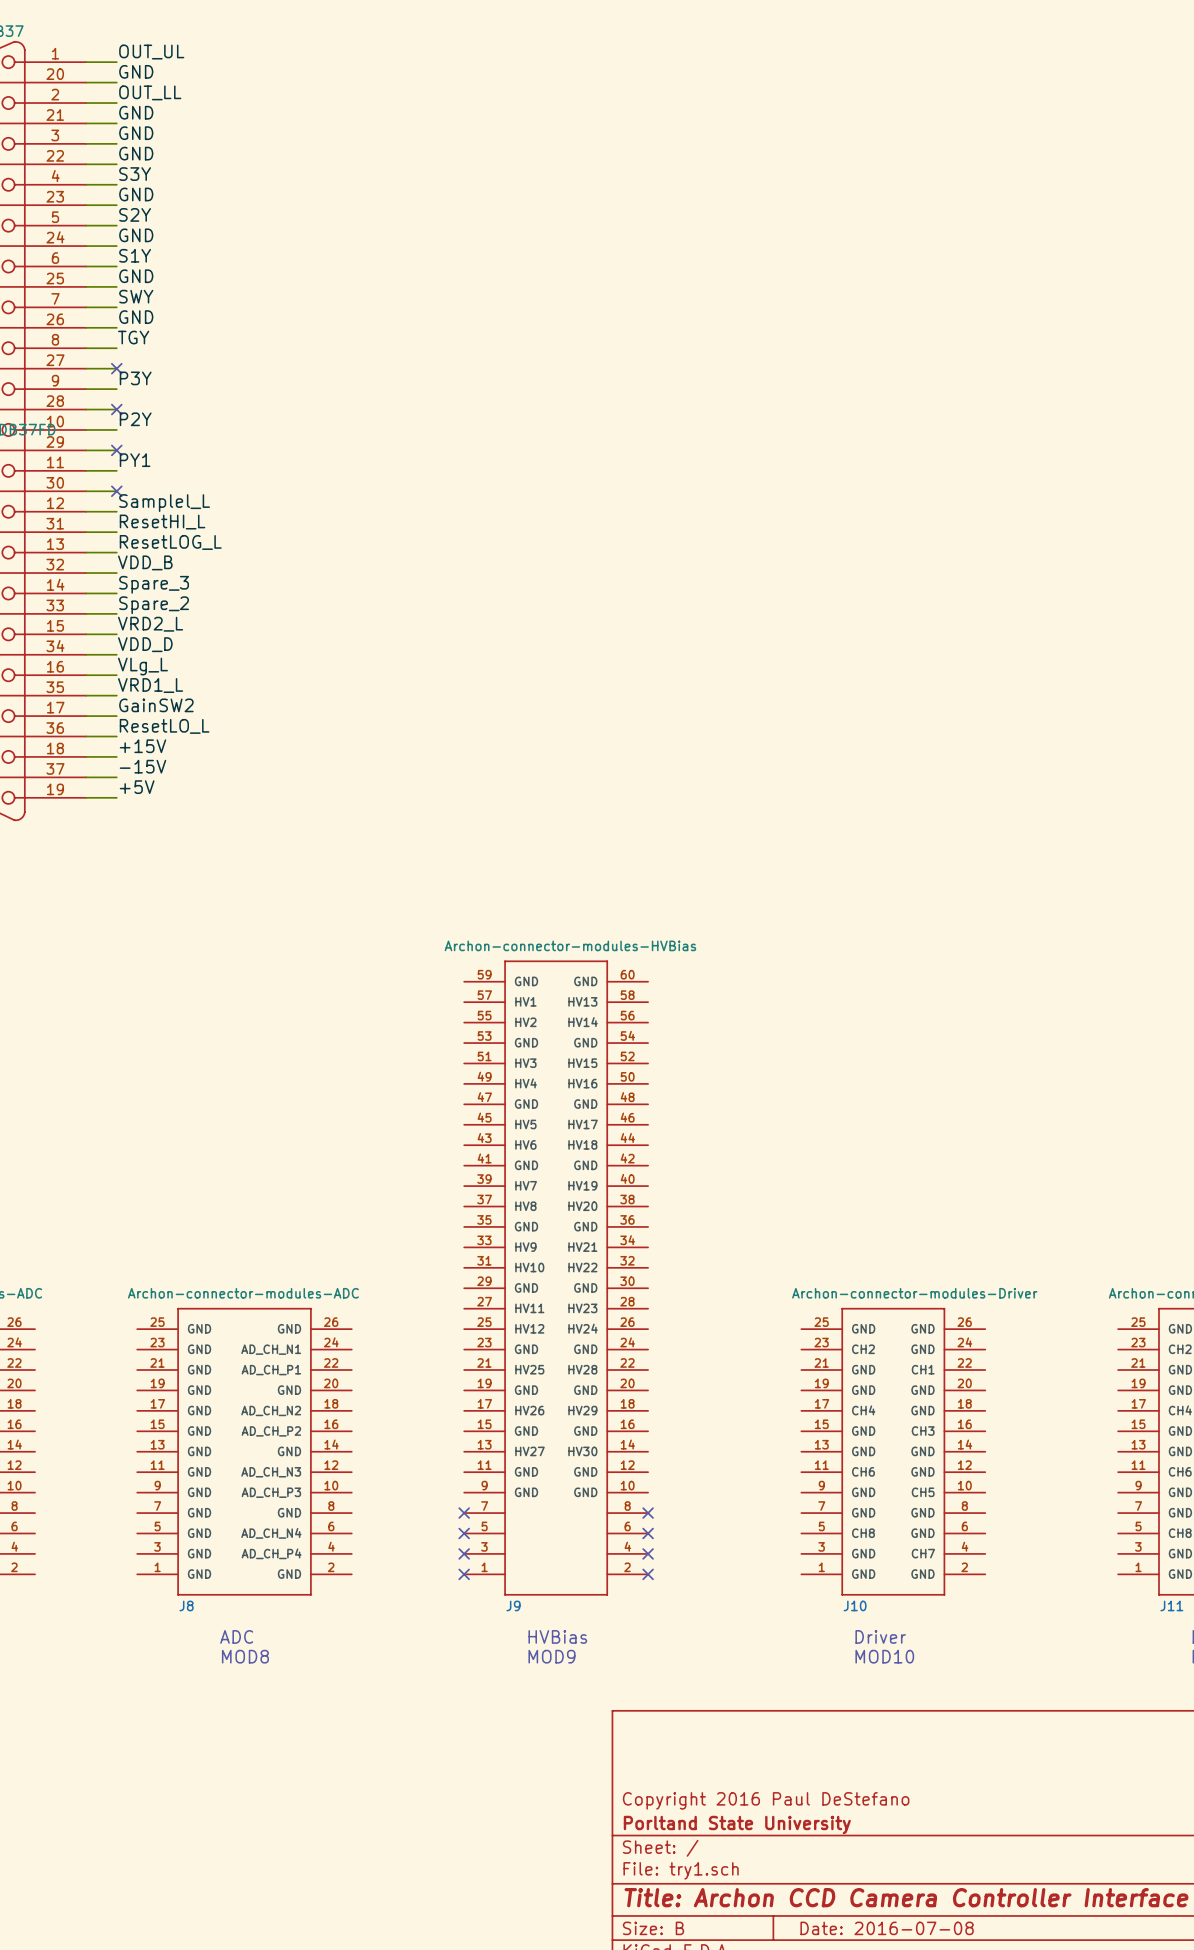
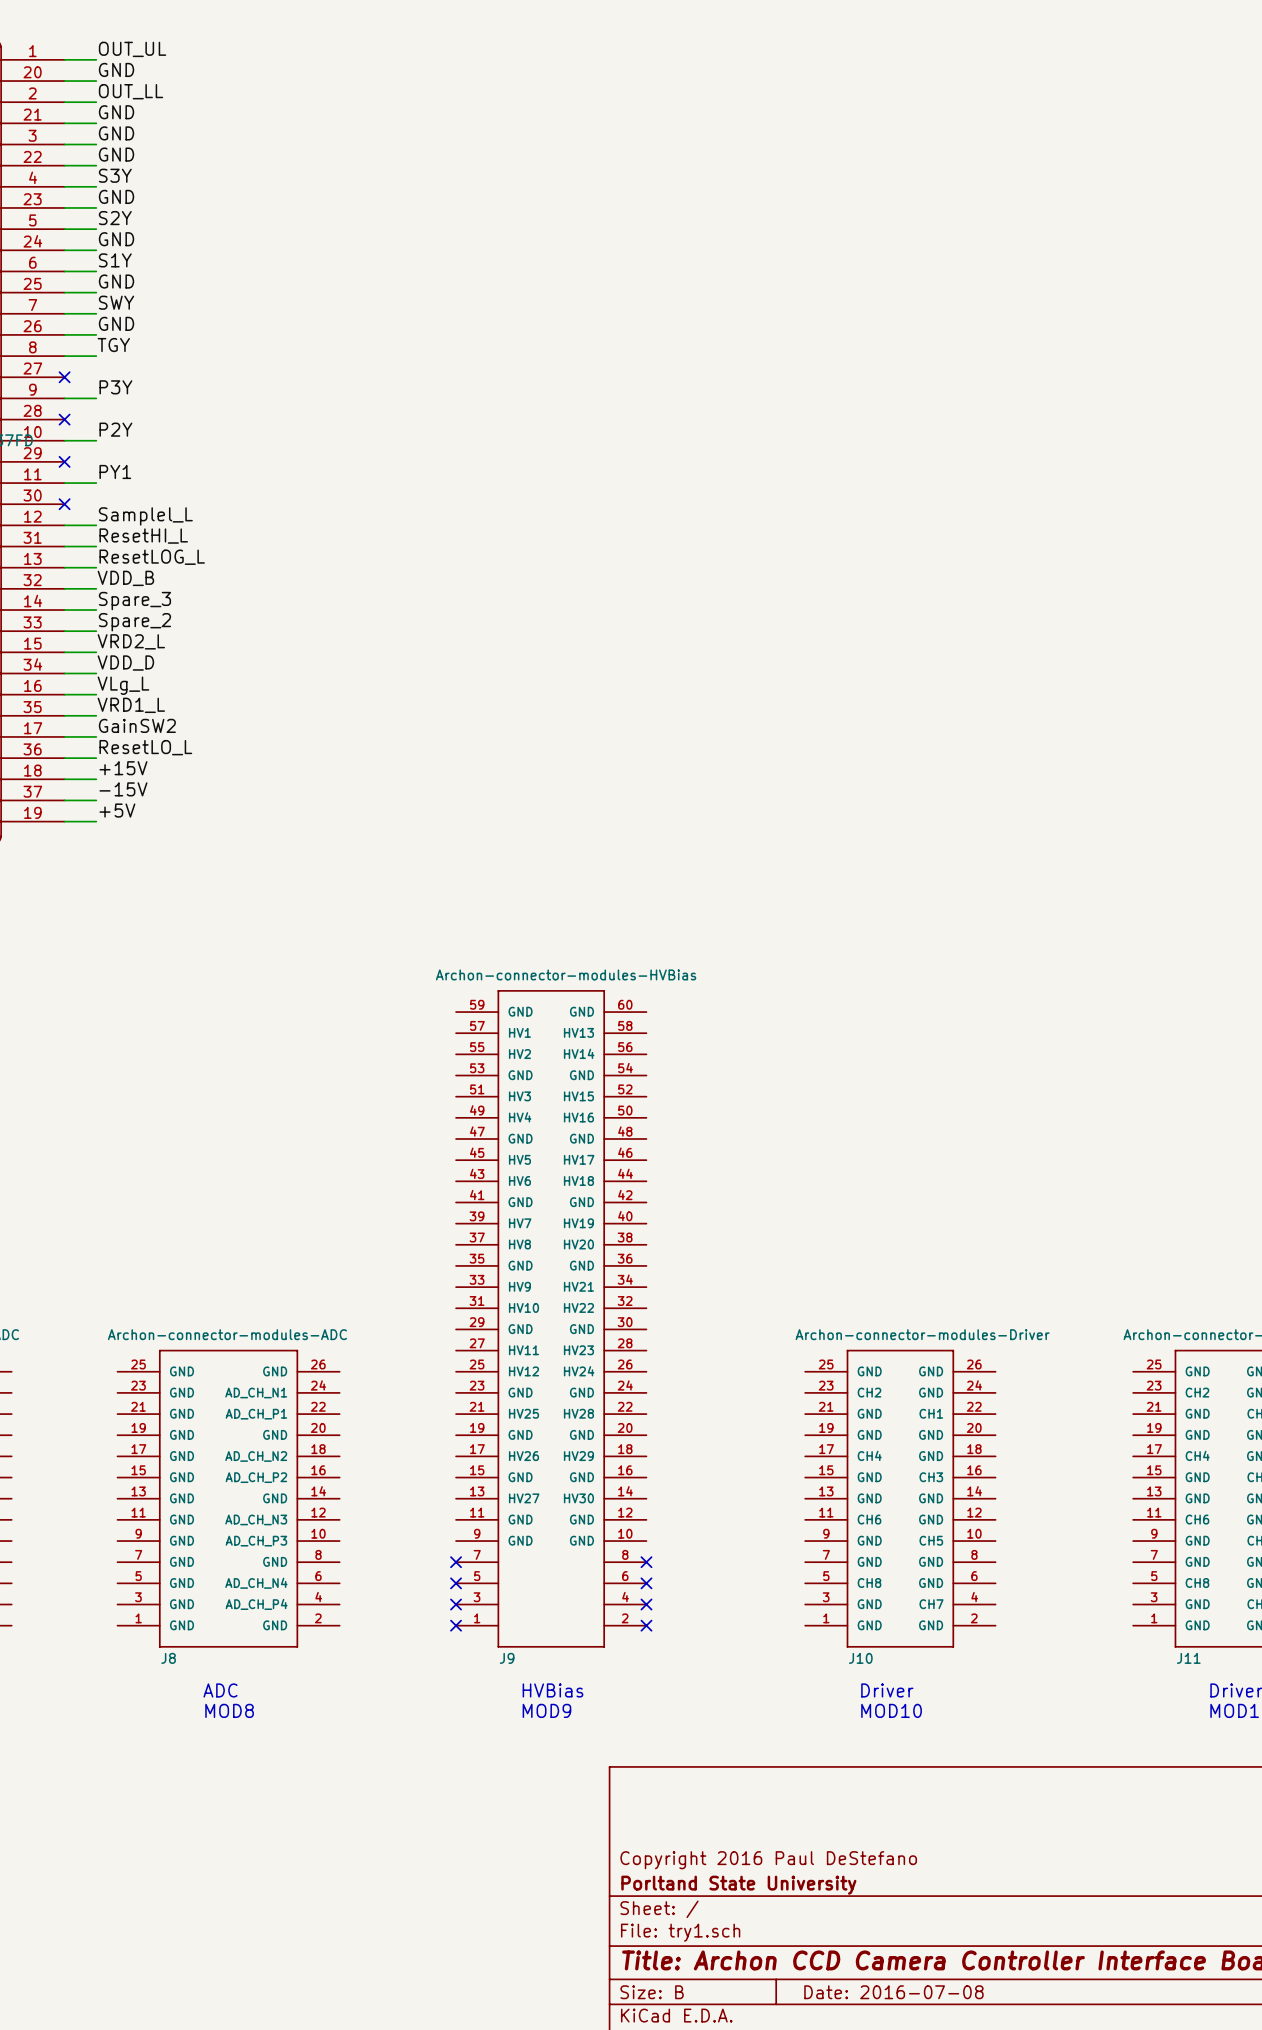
wire: (86, 368) (116, 368) -> none
no-connect mark: none -> (64, 377)
no-connect mark: (116, 368) -> none
wire: (86, 409) (116, 409) -> none
no-connect mark: none -> (64, 419)
no-connect mark: (116, 409) -> none
wire: (86, 450) (116, 450) -> none
no-connect mark: none -> (64, 461)
no-connect mark: (116, 450) -> none
wire: (86, 491) (116, 491) -> none
no-connect mark: none -> (64, 504)
no-connect mark: (116, 491) -> none

